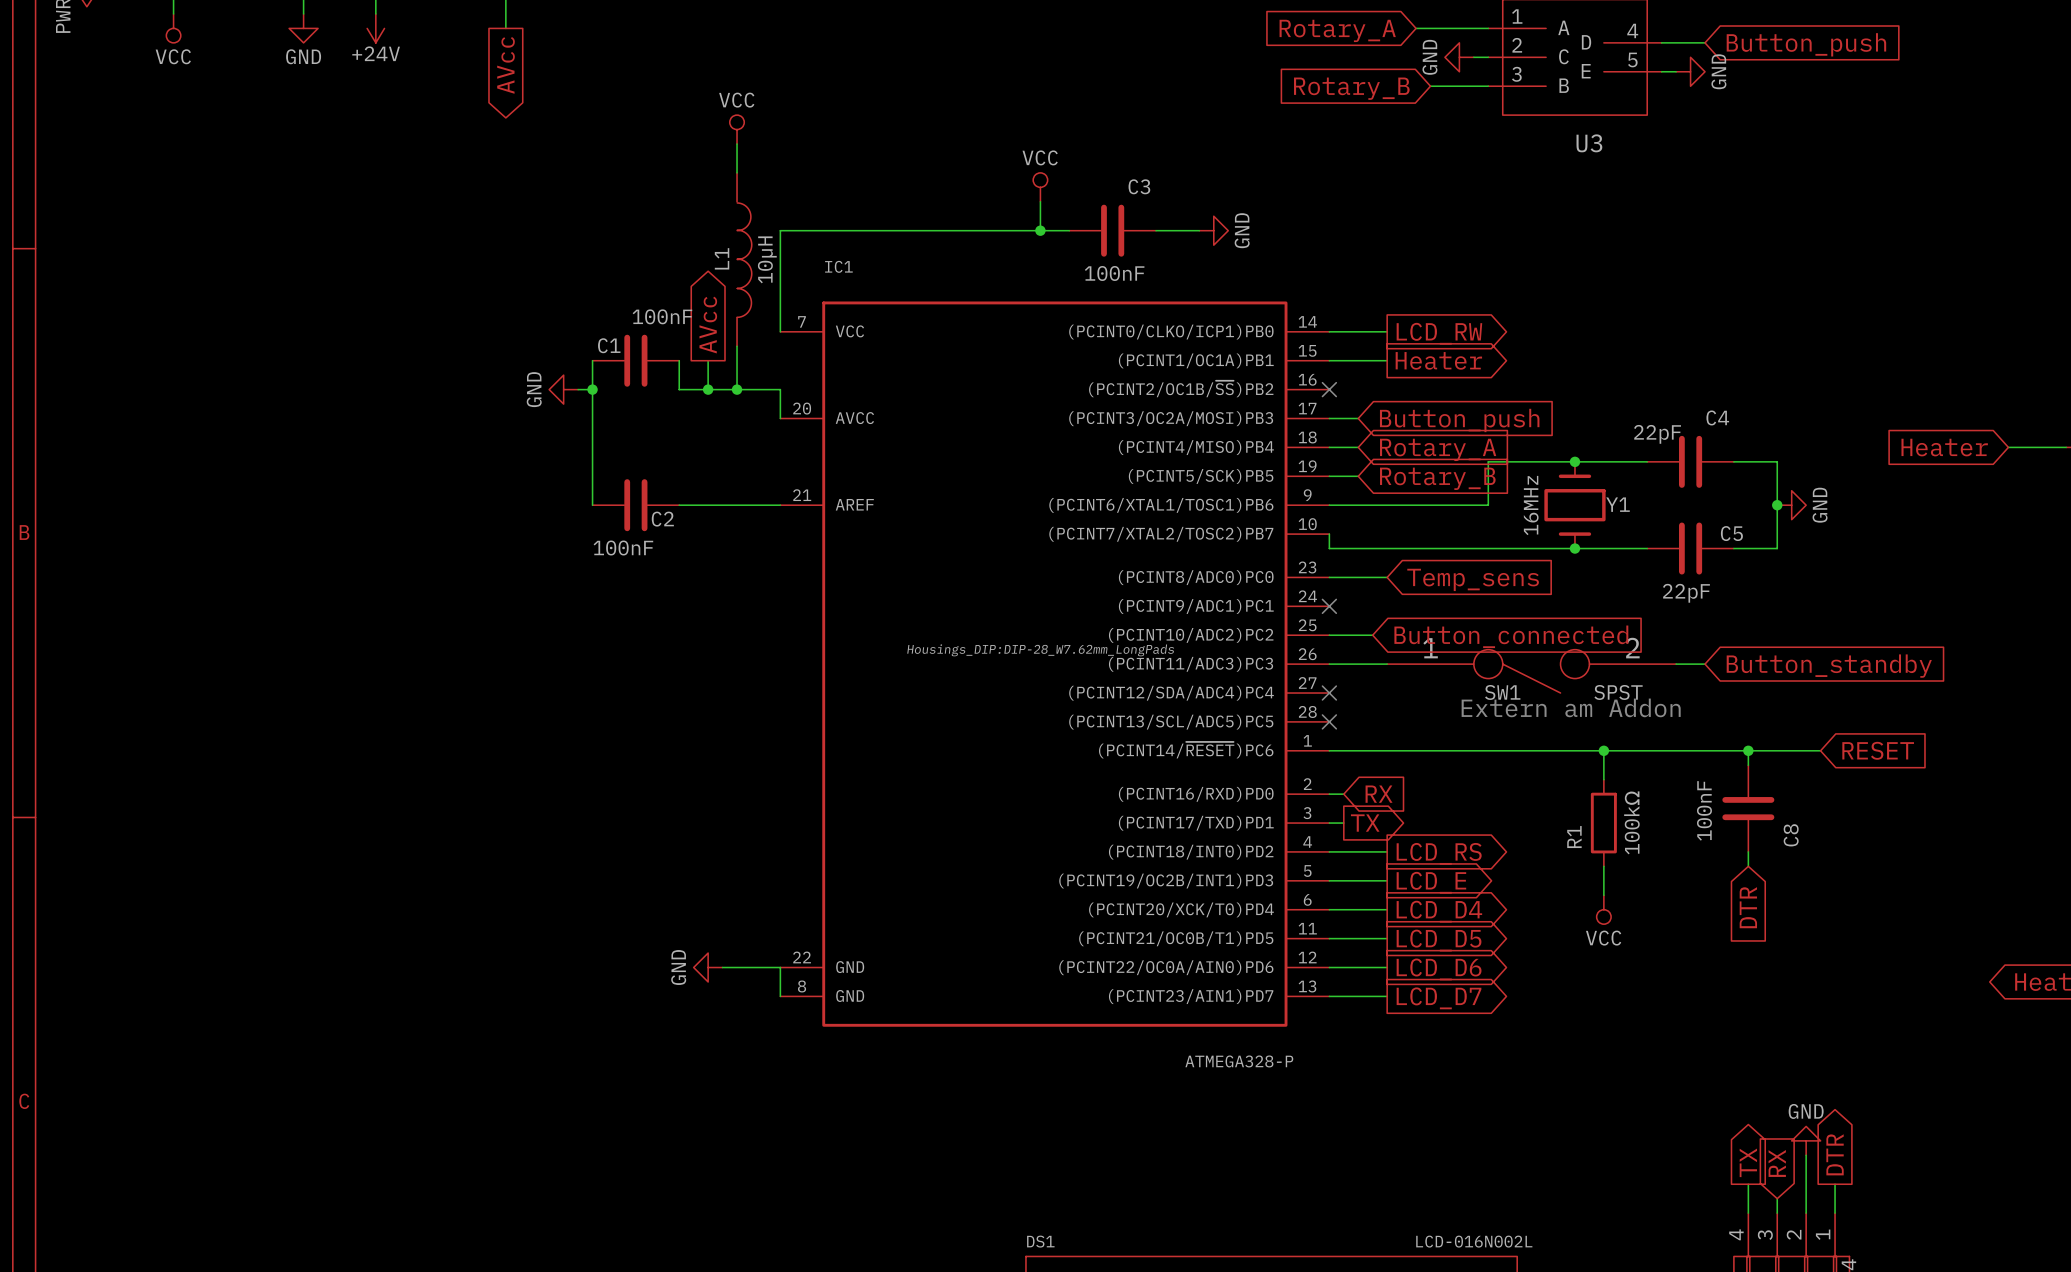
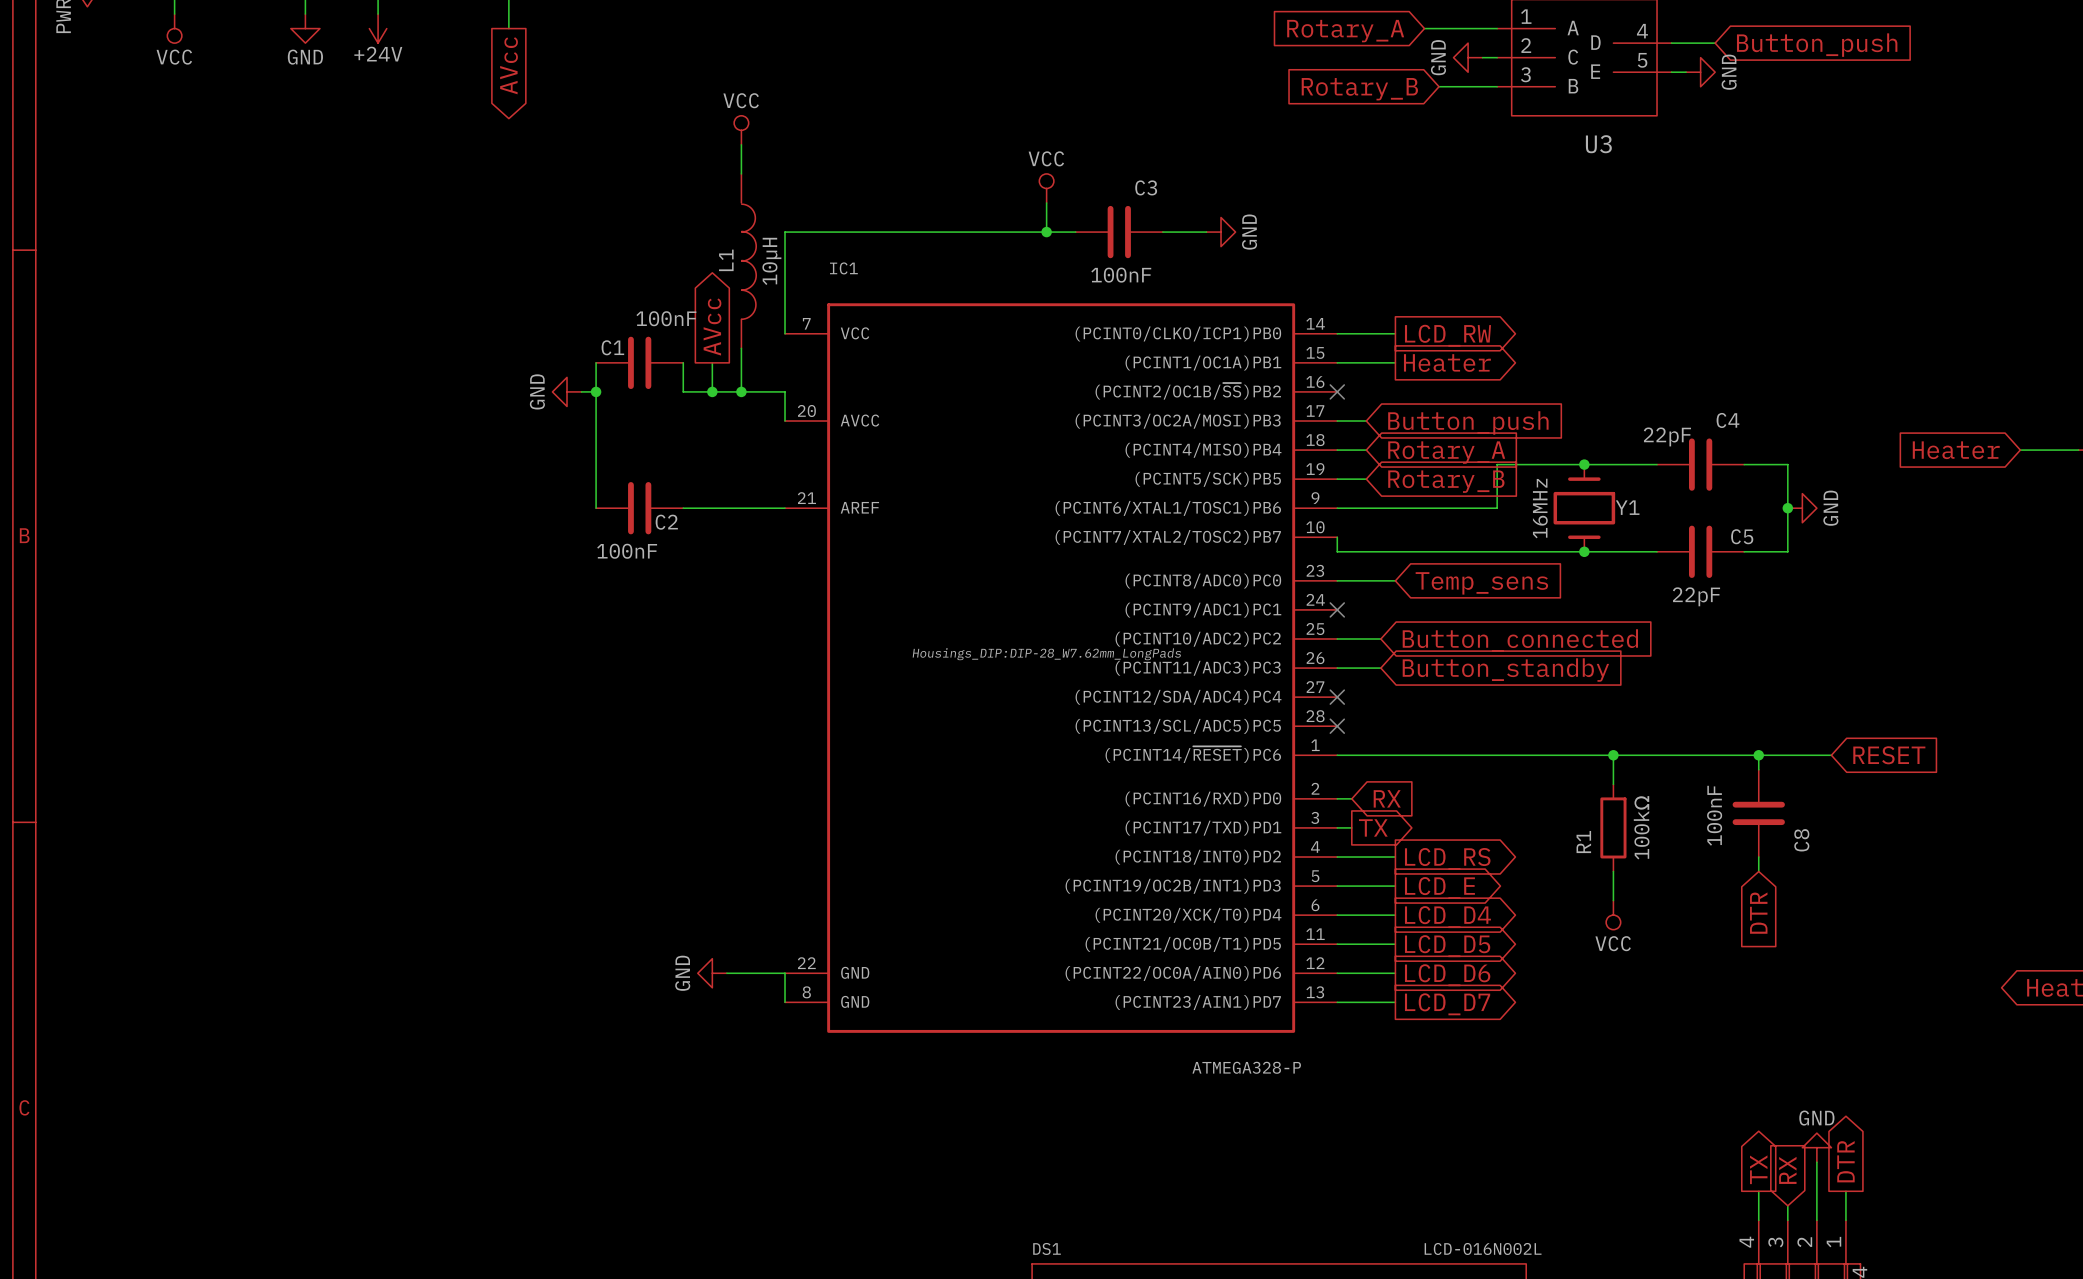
wire: (1372, 664) (1387, 664) -> none
wire: (1676, 664) (1705, 664) -> none
global label: none -> Button_standby (1505, 670)
global label: Button_standby (1829, 666) -> none
SW1: SPST (1531, 671) -> none
text: Extern am Addon (1571, 707) -> none

